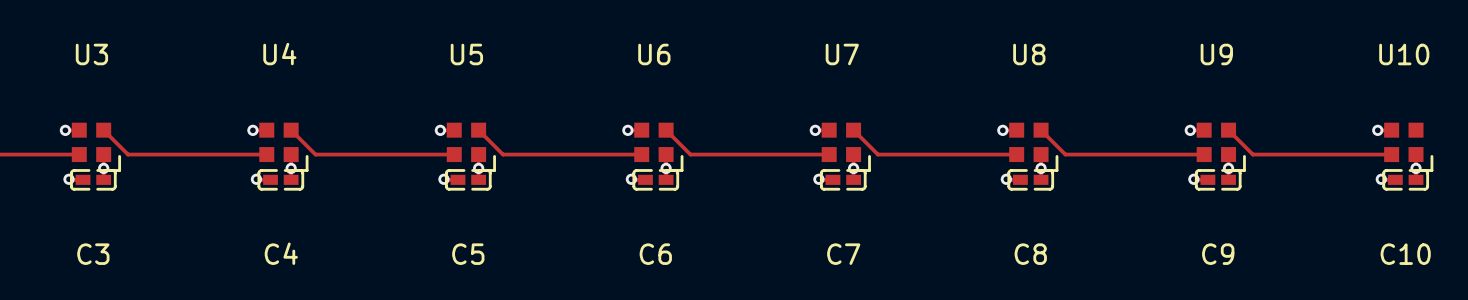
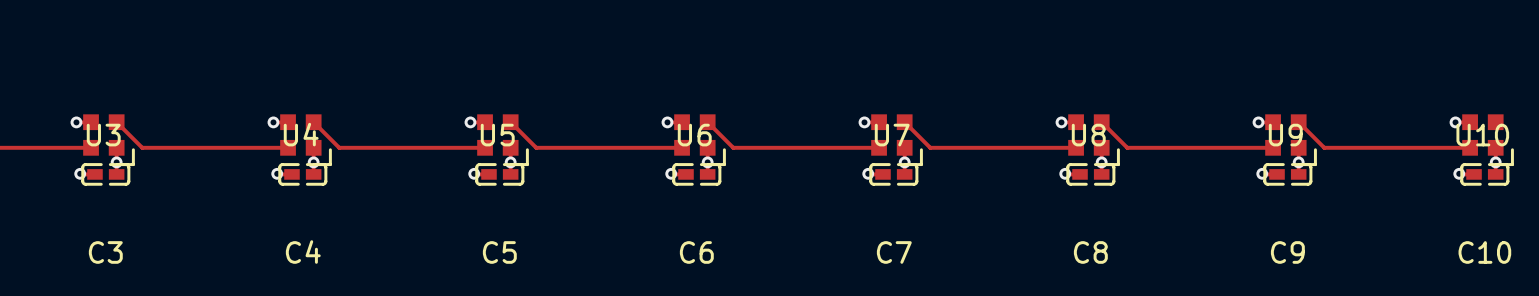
U3 name position: U3 (91, 54) -> U3 (103, 135)
U4 name position: U4 (279, 54) -> U4 (301, 134)
U5 name position: U5 (466, 54) -> U5 (497, 135)
U6 name position: U6 (654, 54) -> U6 (694, 135)
U7 name position: U7 (842, 54) -> U7 (892, 135)
U8 name position: U8 (1029, 54) -> U8 (1088, 135)
U9 name position: U9 (1216, 54) -> U9 (1285, 135)
U10 name position: U10 (1404, 54) -> U10 (1482, 135)

